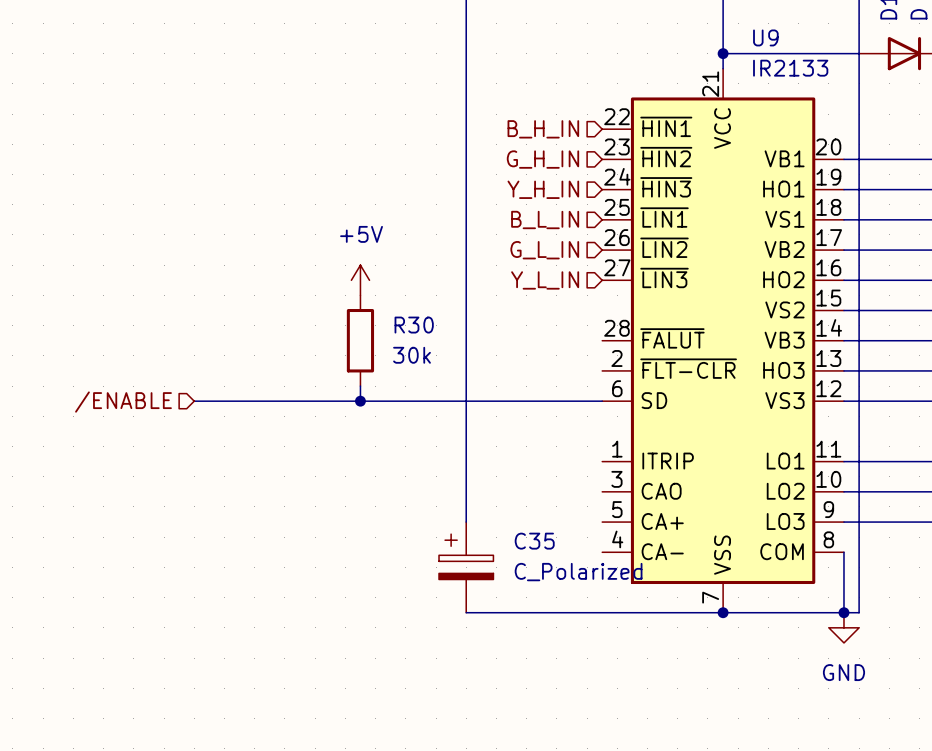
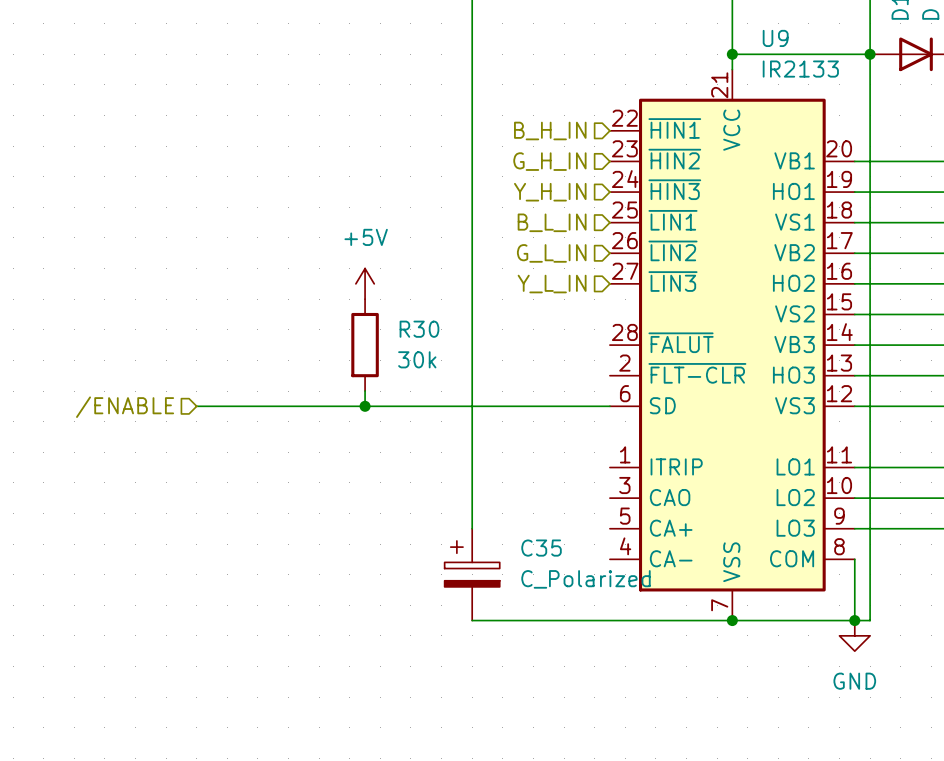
junction: none -> (870, 54)

